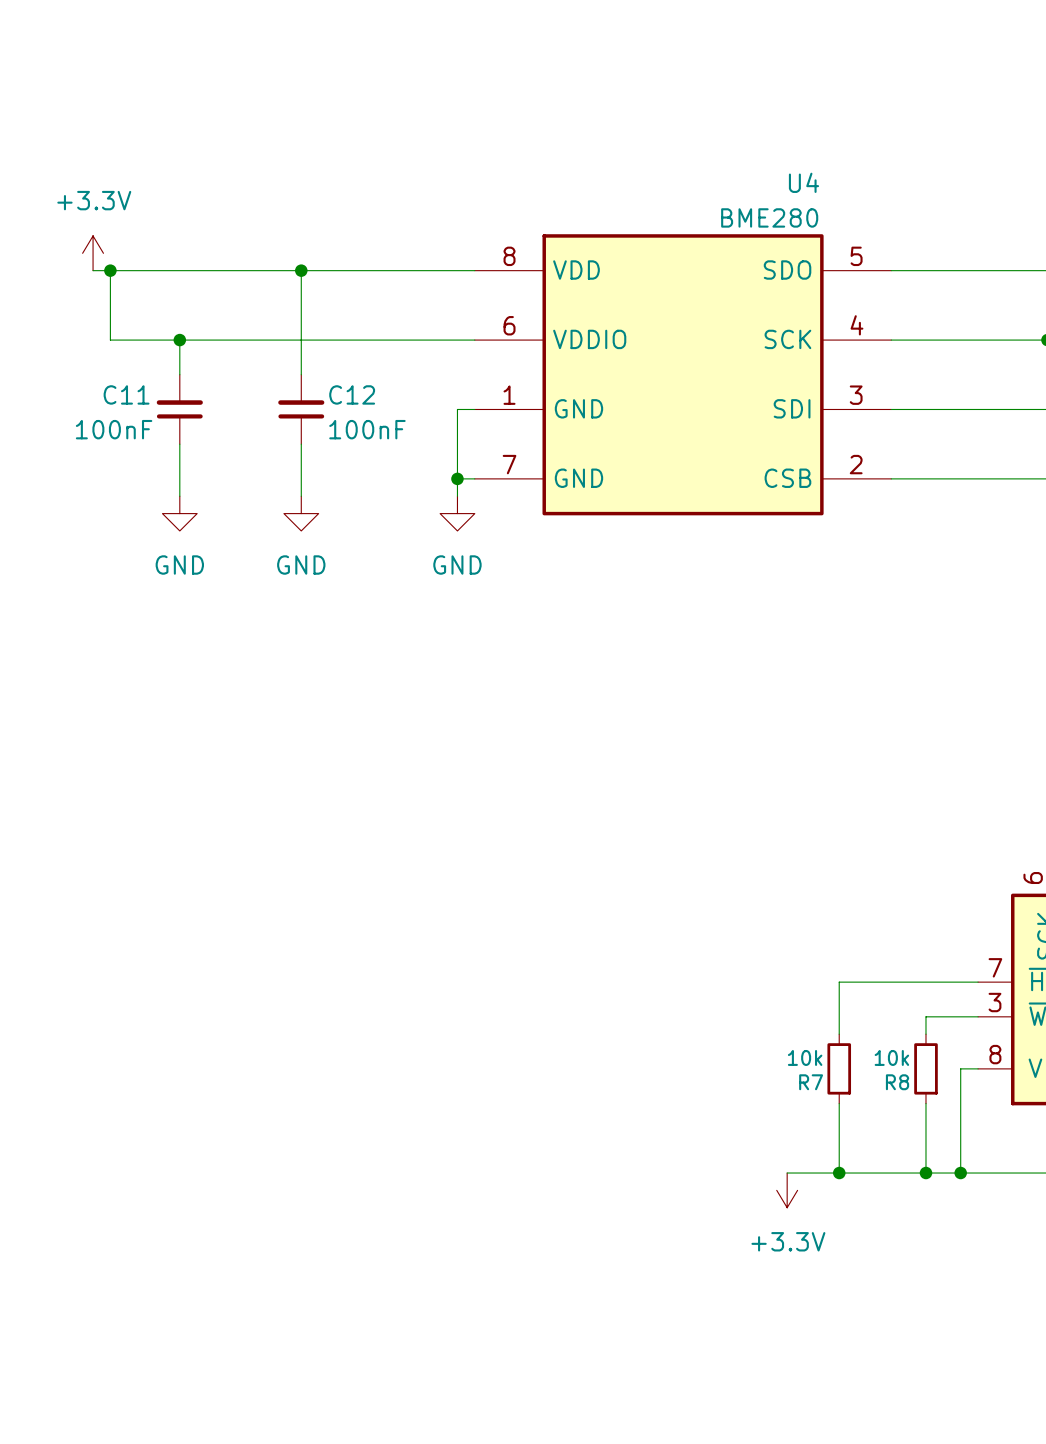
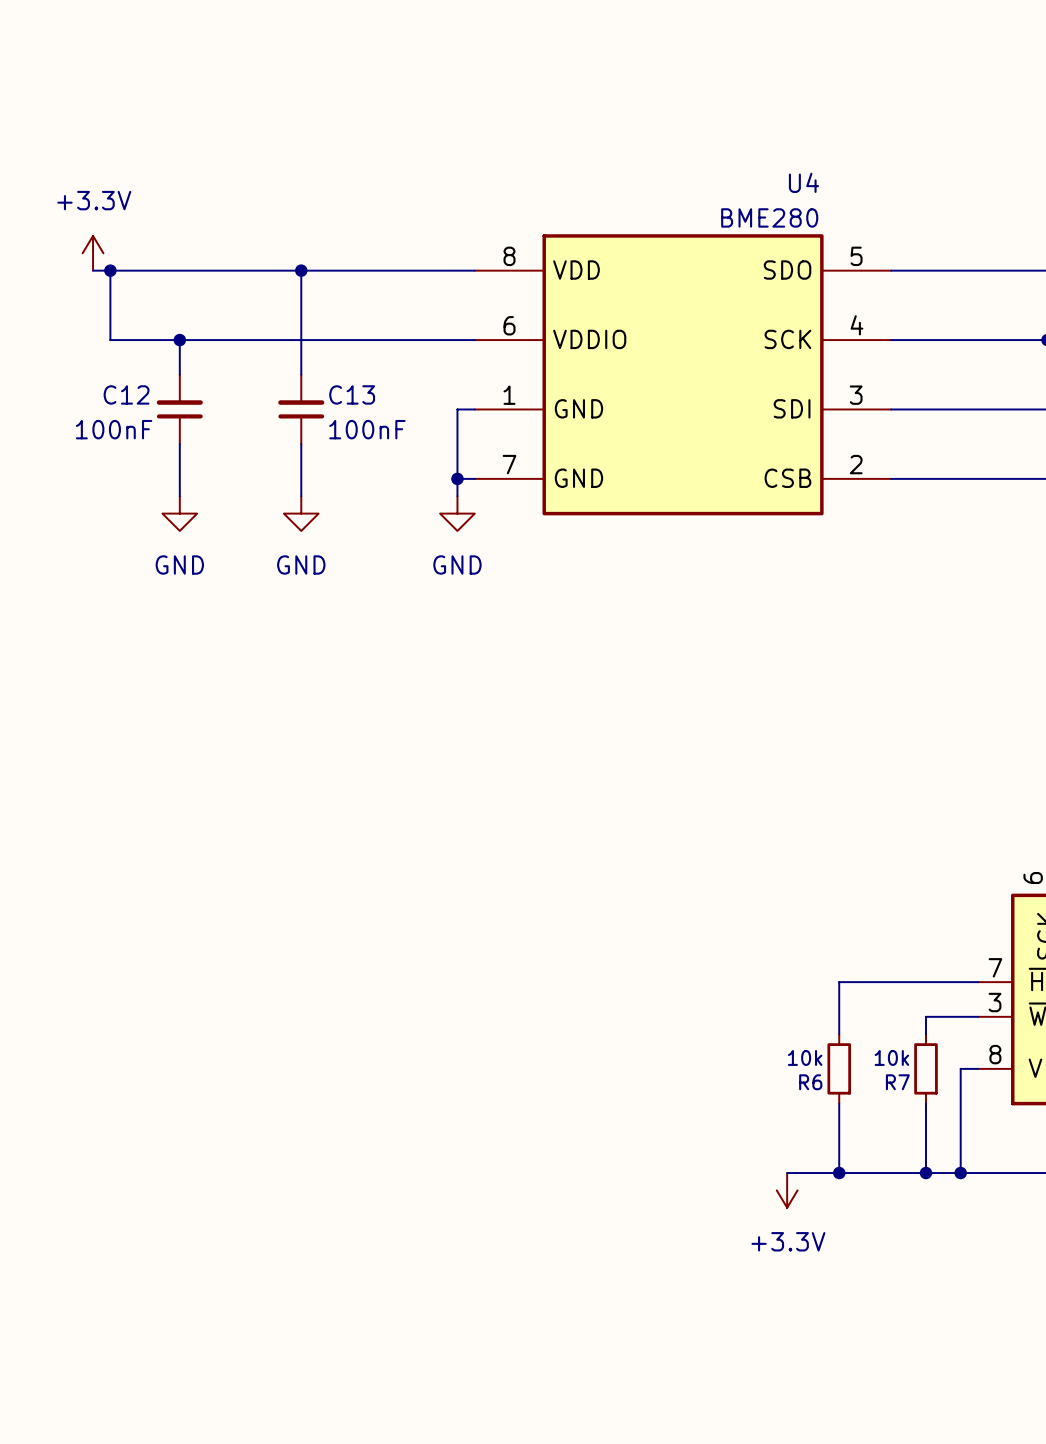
C11 name: C11 (126, 394) -> C12 (126, 394)
C12 name: C12 (352, 394) -> C13 (352, 394)
R7 name: R7 (811, 1082) -> R6 (810, 1082)
R8 name: R8 (897, 1082) -> R7 (897, 1082)

